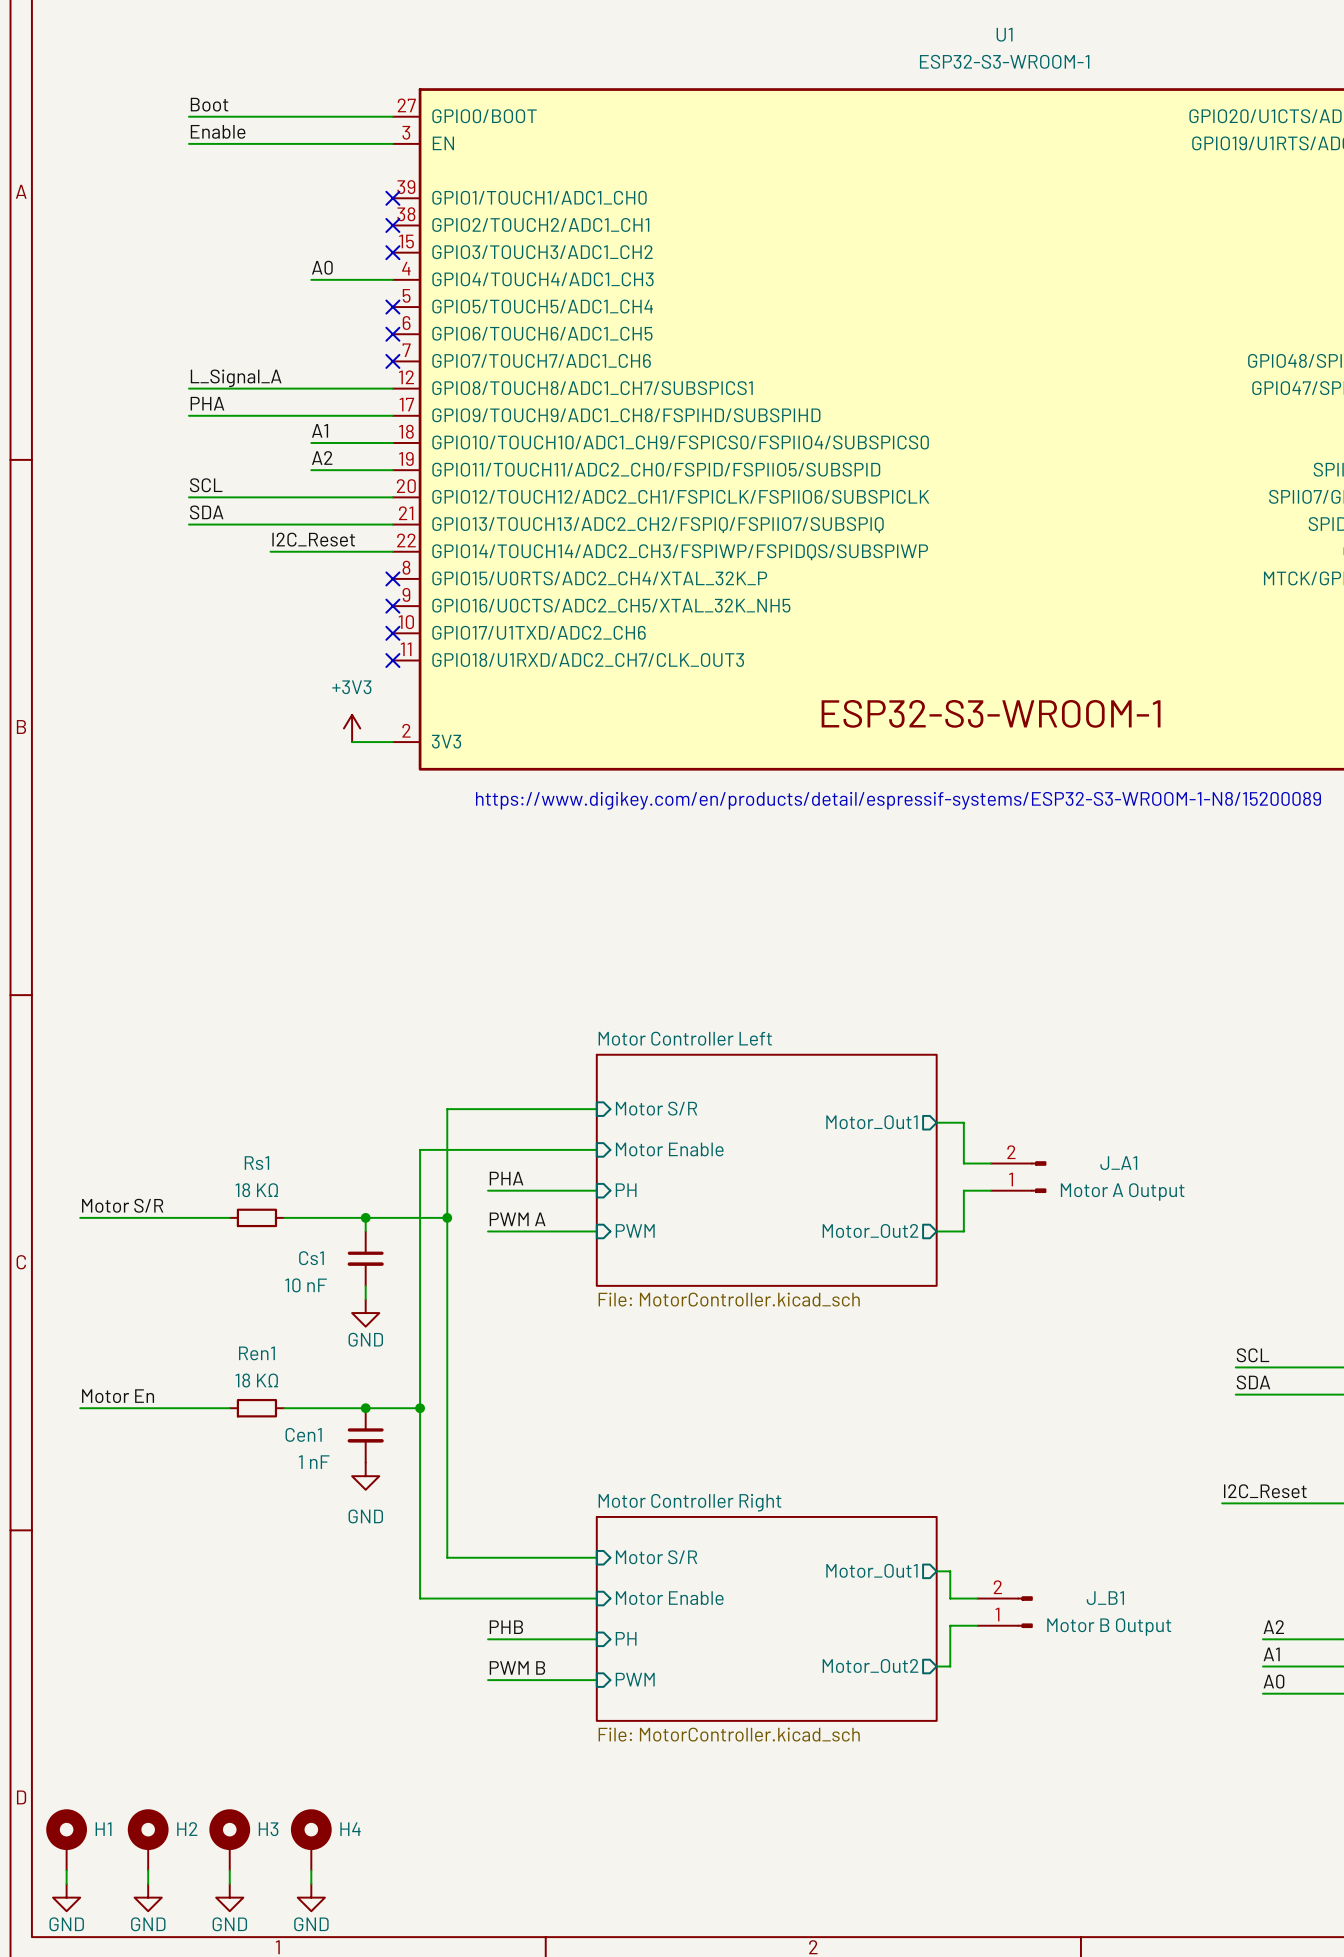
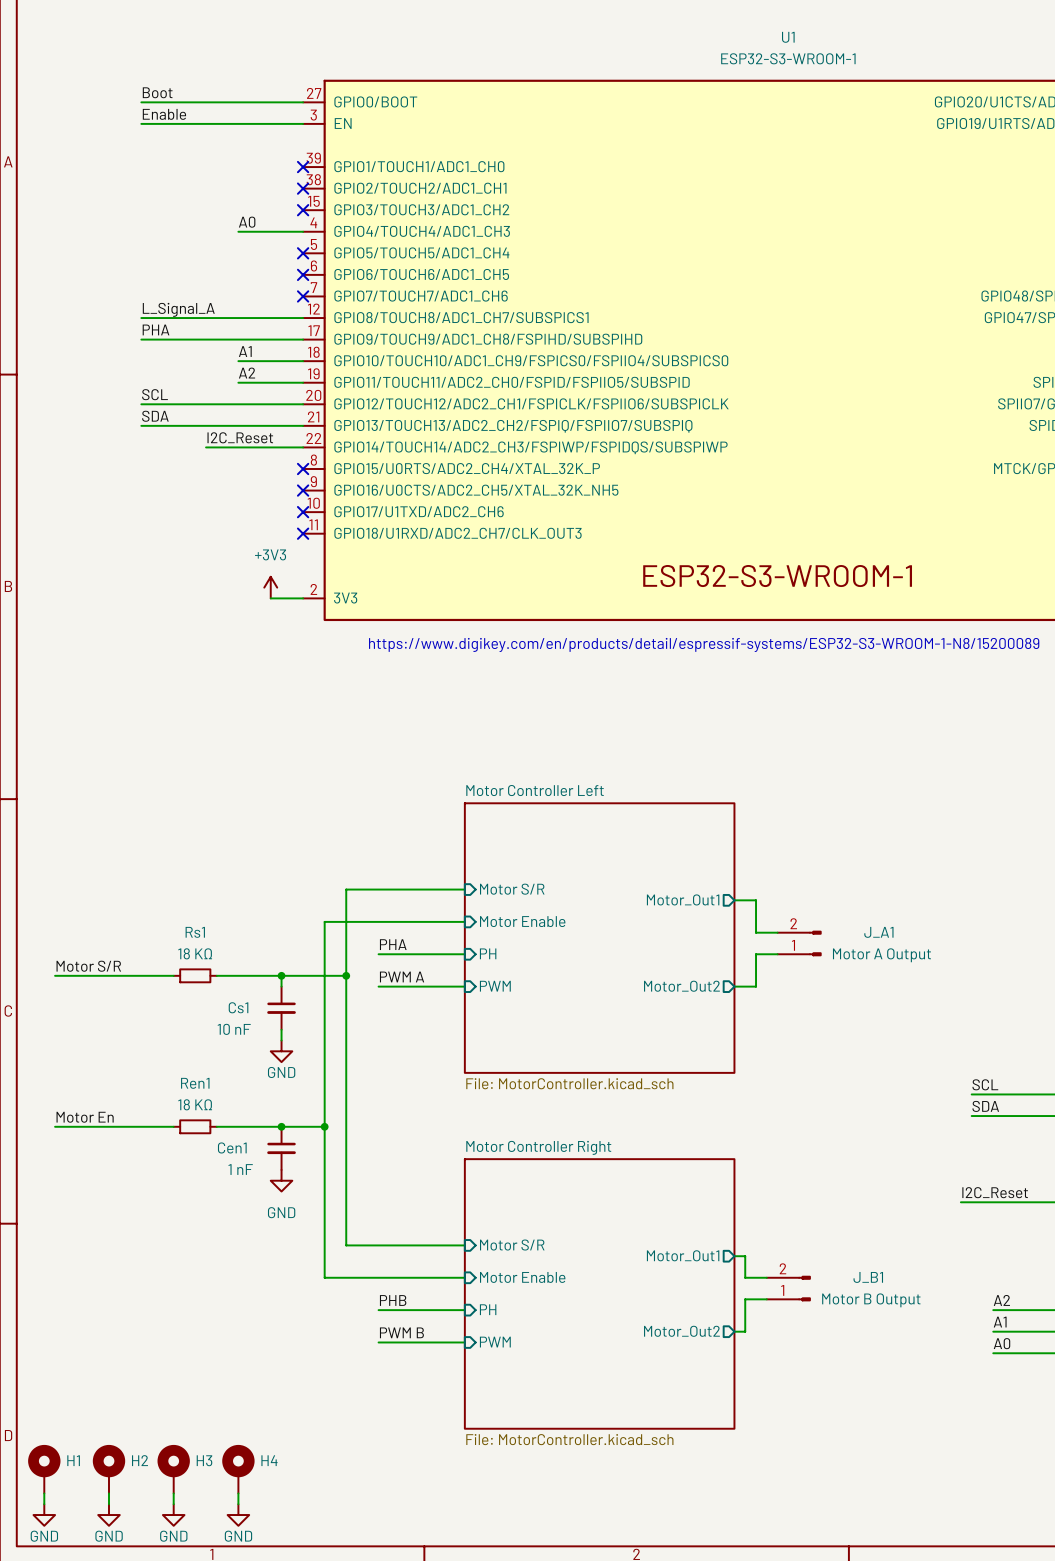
sheet Motor Controller Left name position: Motor Controller Left (685, 1038) -> Motor Controller Left (535, 790)
sheet Motor Controller Left shape: [595, 1053, 938, 1287] -> [464, 802, 736, 1074]
sheet Motor Controller Left value position: File: MotorController.kicad_sch (729, 1299) -> File: MotorController.kicad_sch (569, 1083)
sheet Motor Controller Right name position: Motor Controller Right (689, 1502) -> Motor Controller Right (538, 1147)
sheet Motor Controller Right shape: [595, 1516, 938, 1722] -> [464, 1158, 736, 1430]
sheet Motor Controller Right value position: File: MotorController.kicad_sch (729, 1734) -> File: MotorController.kicad_sch (569, 1439)

